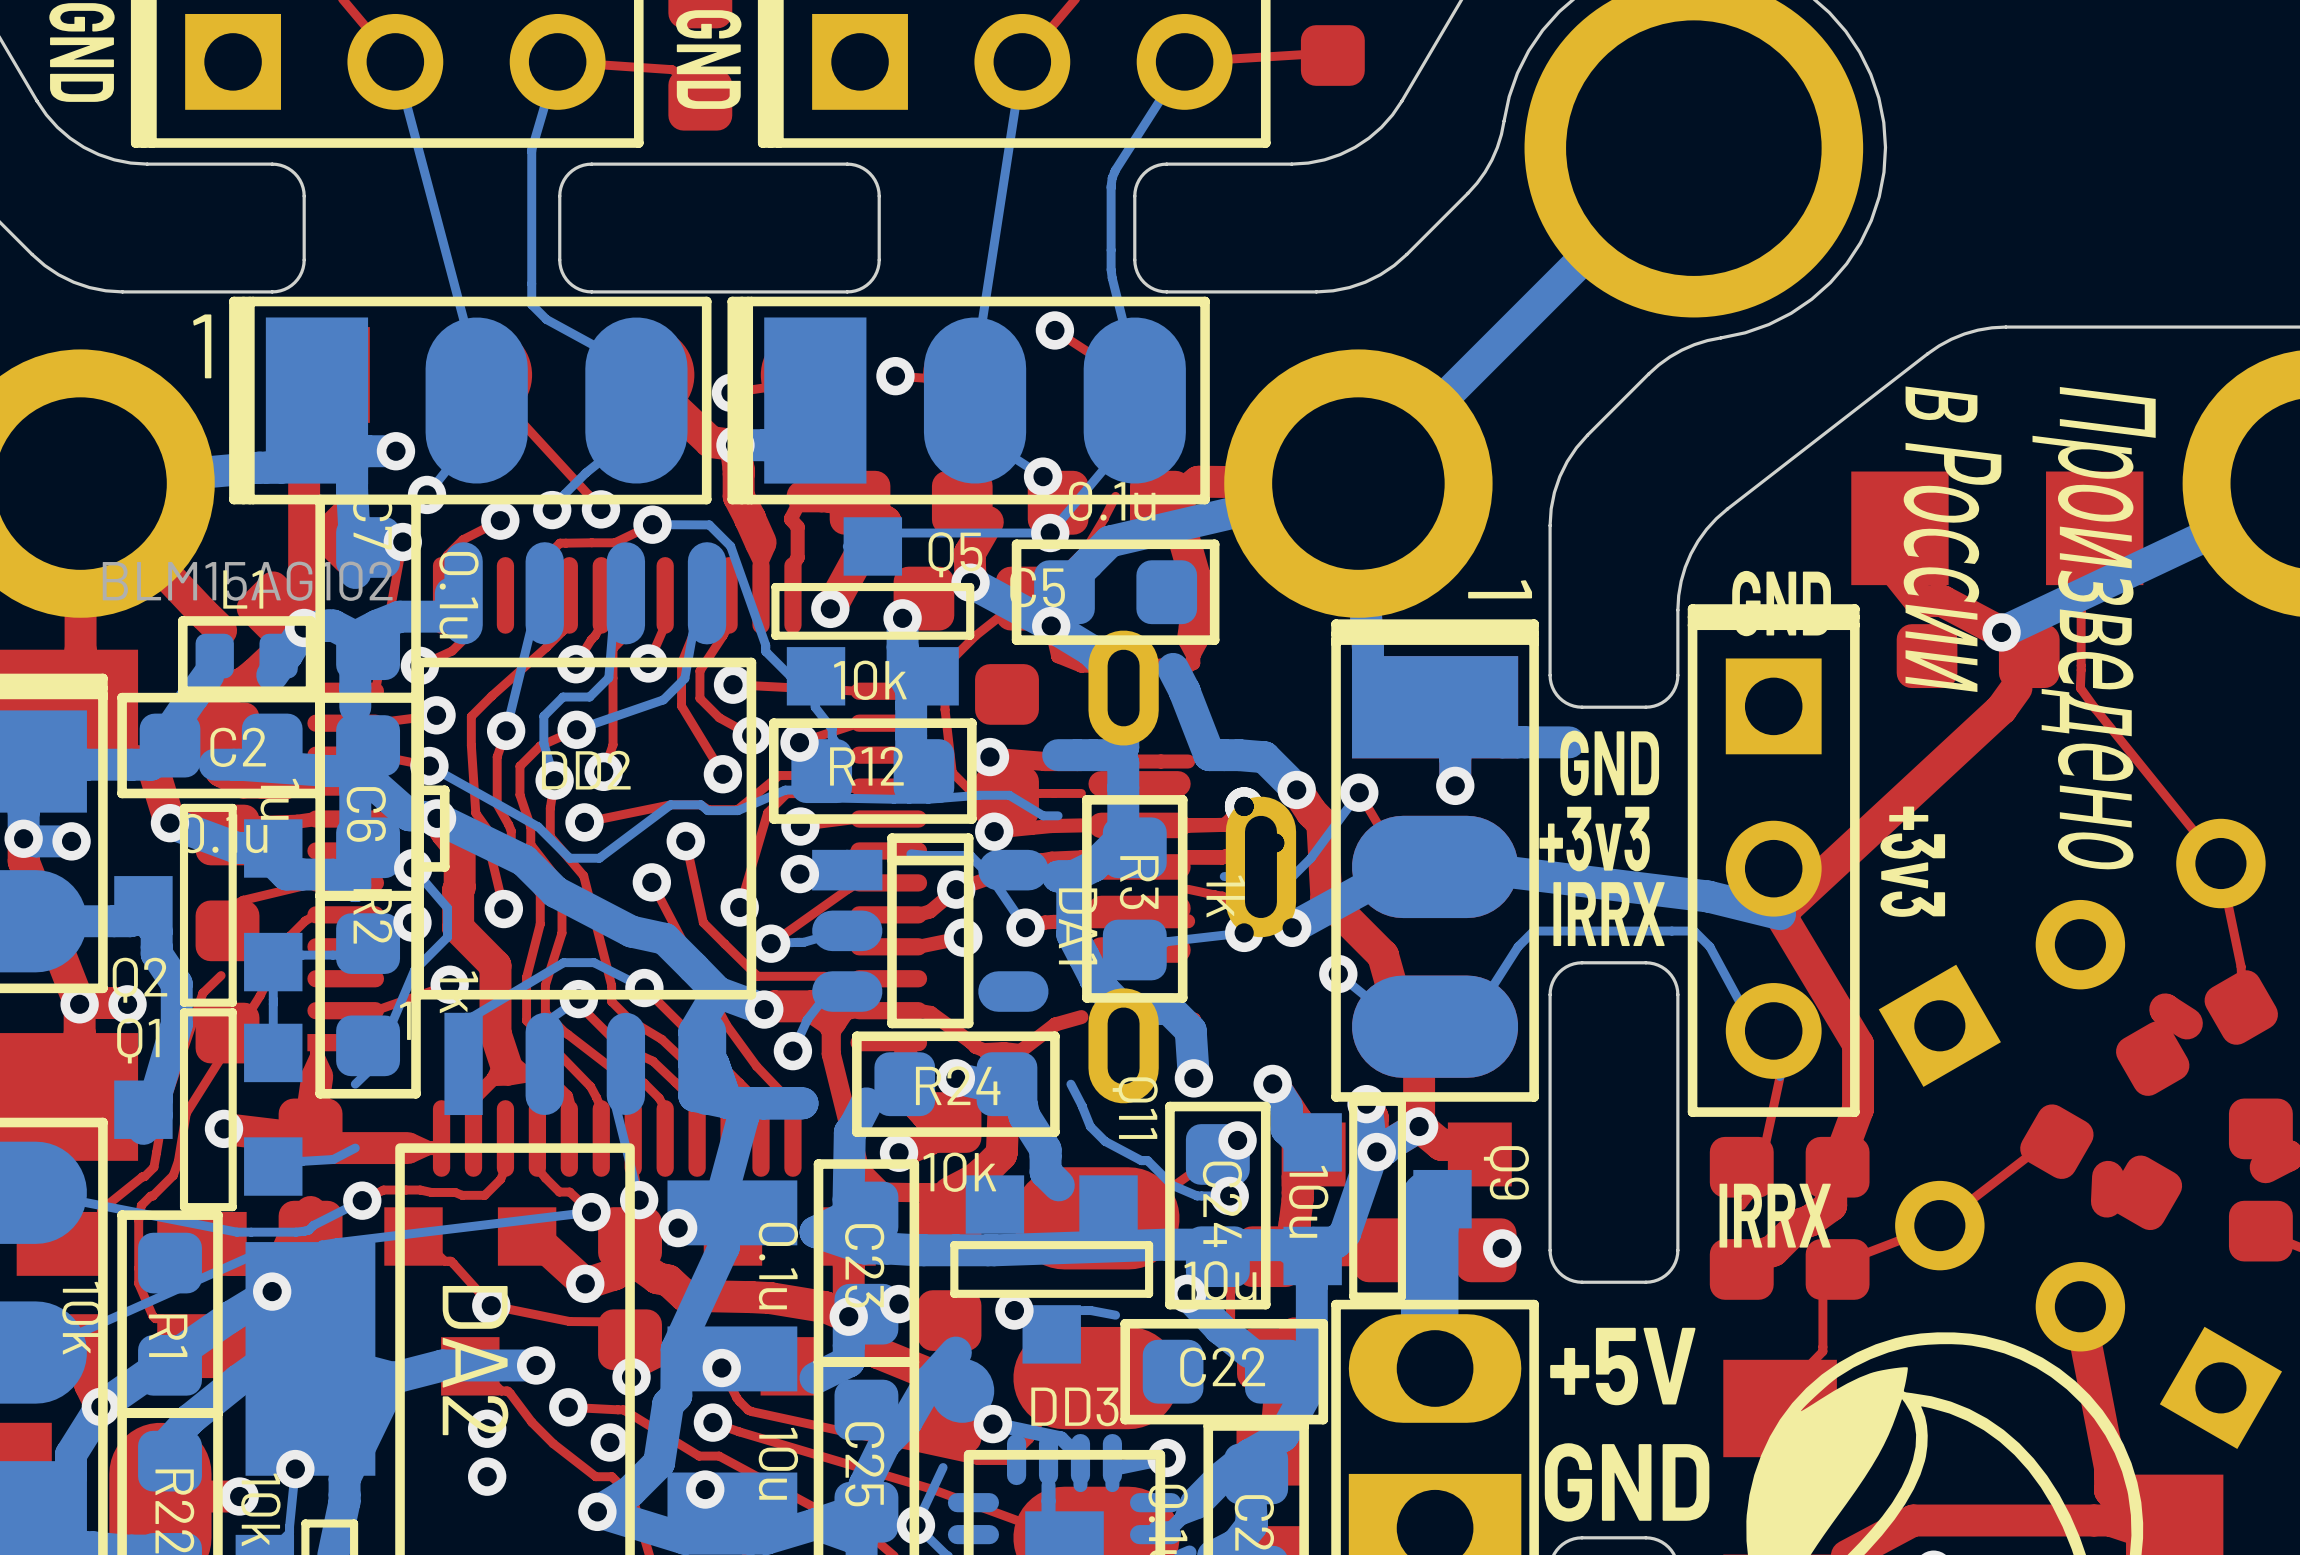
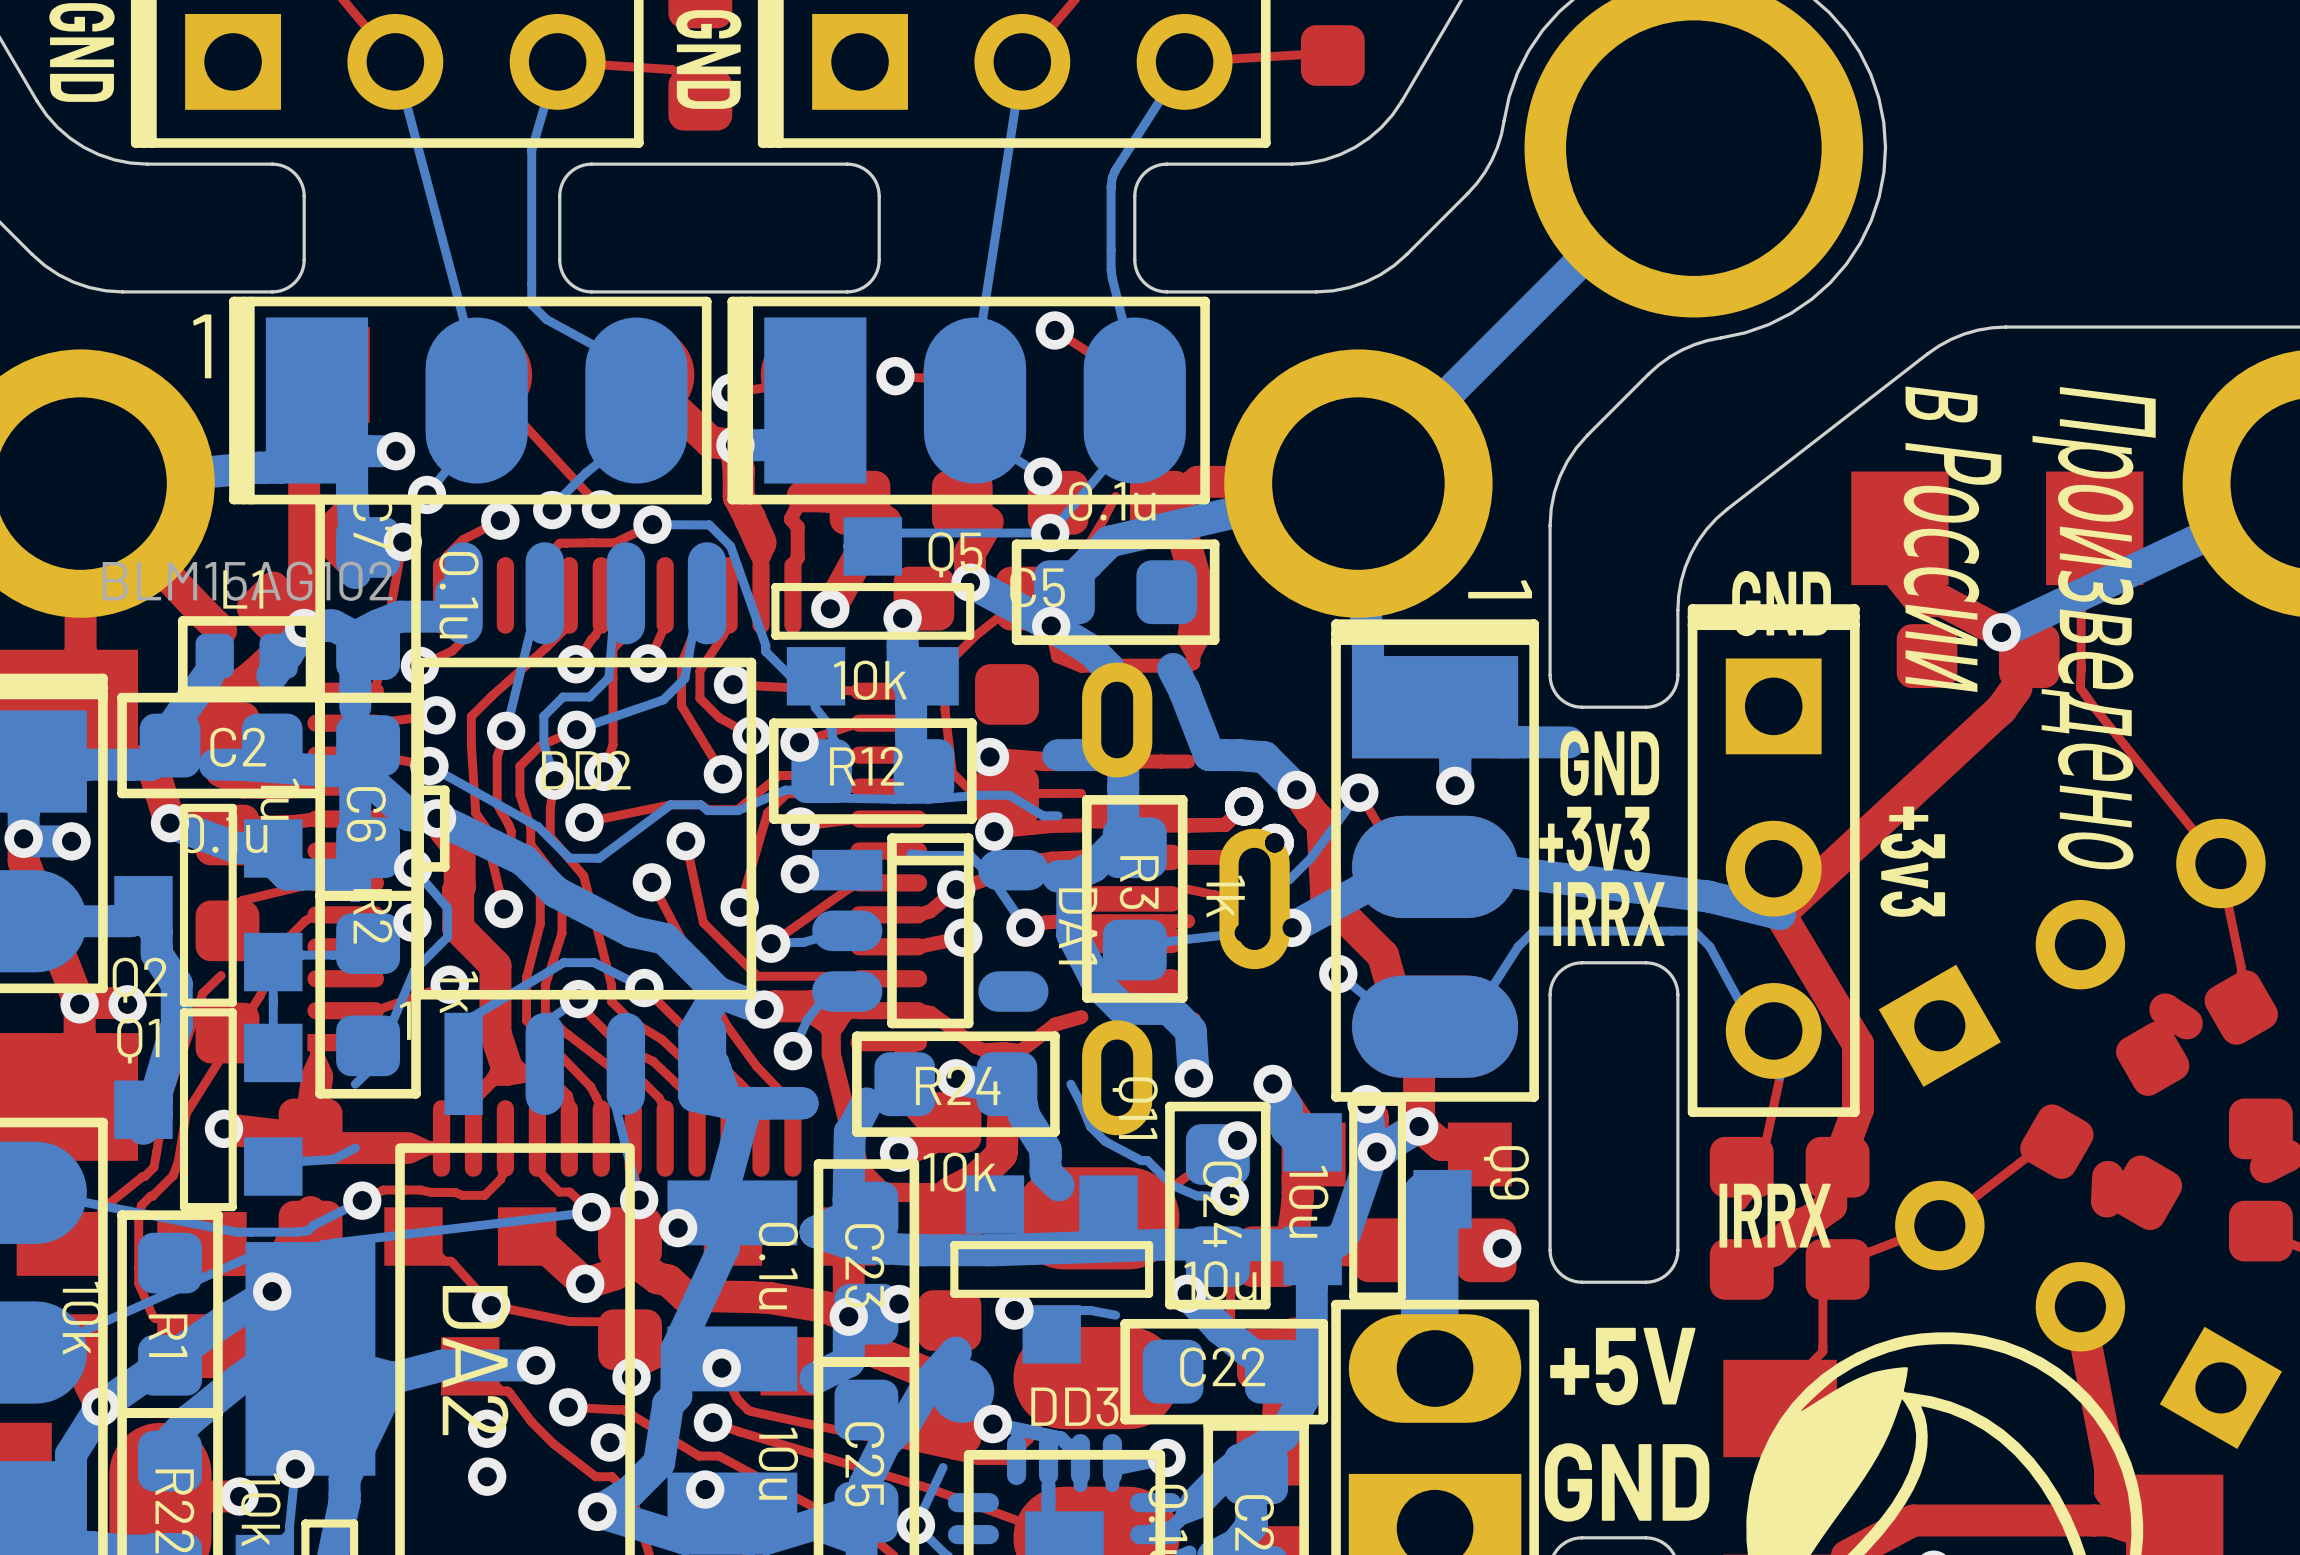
part position: (1192, 866) -> (1185, 898)

